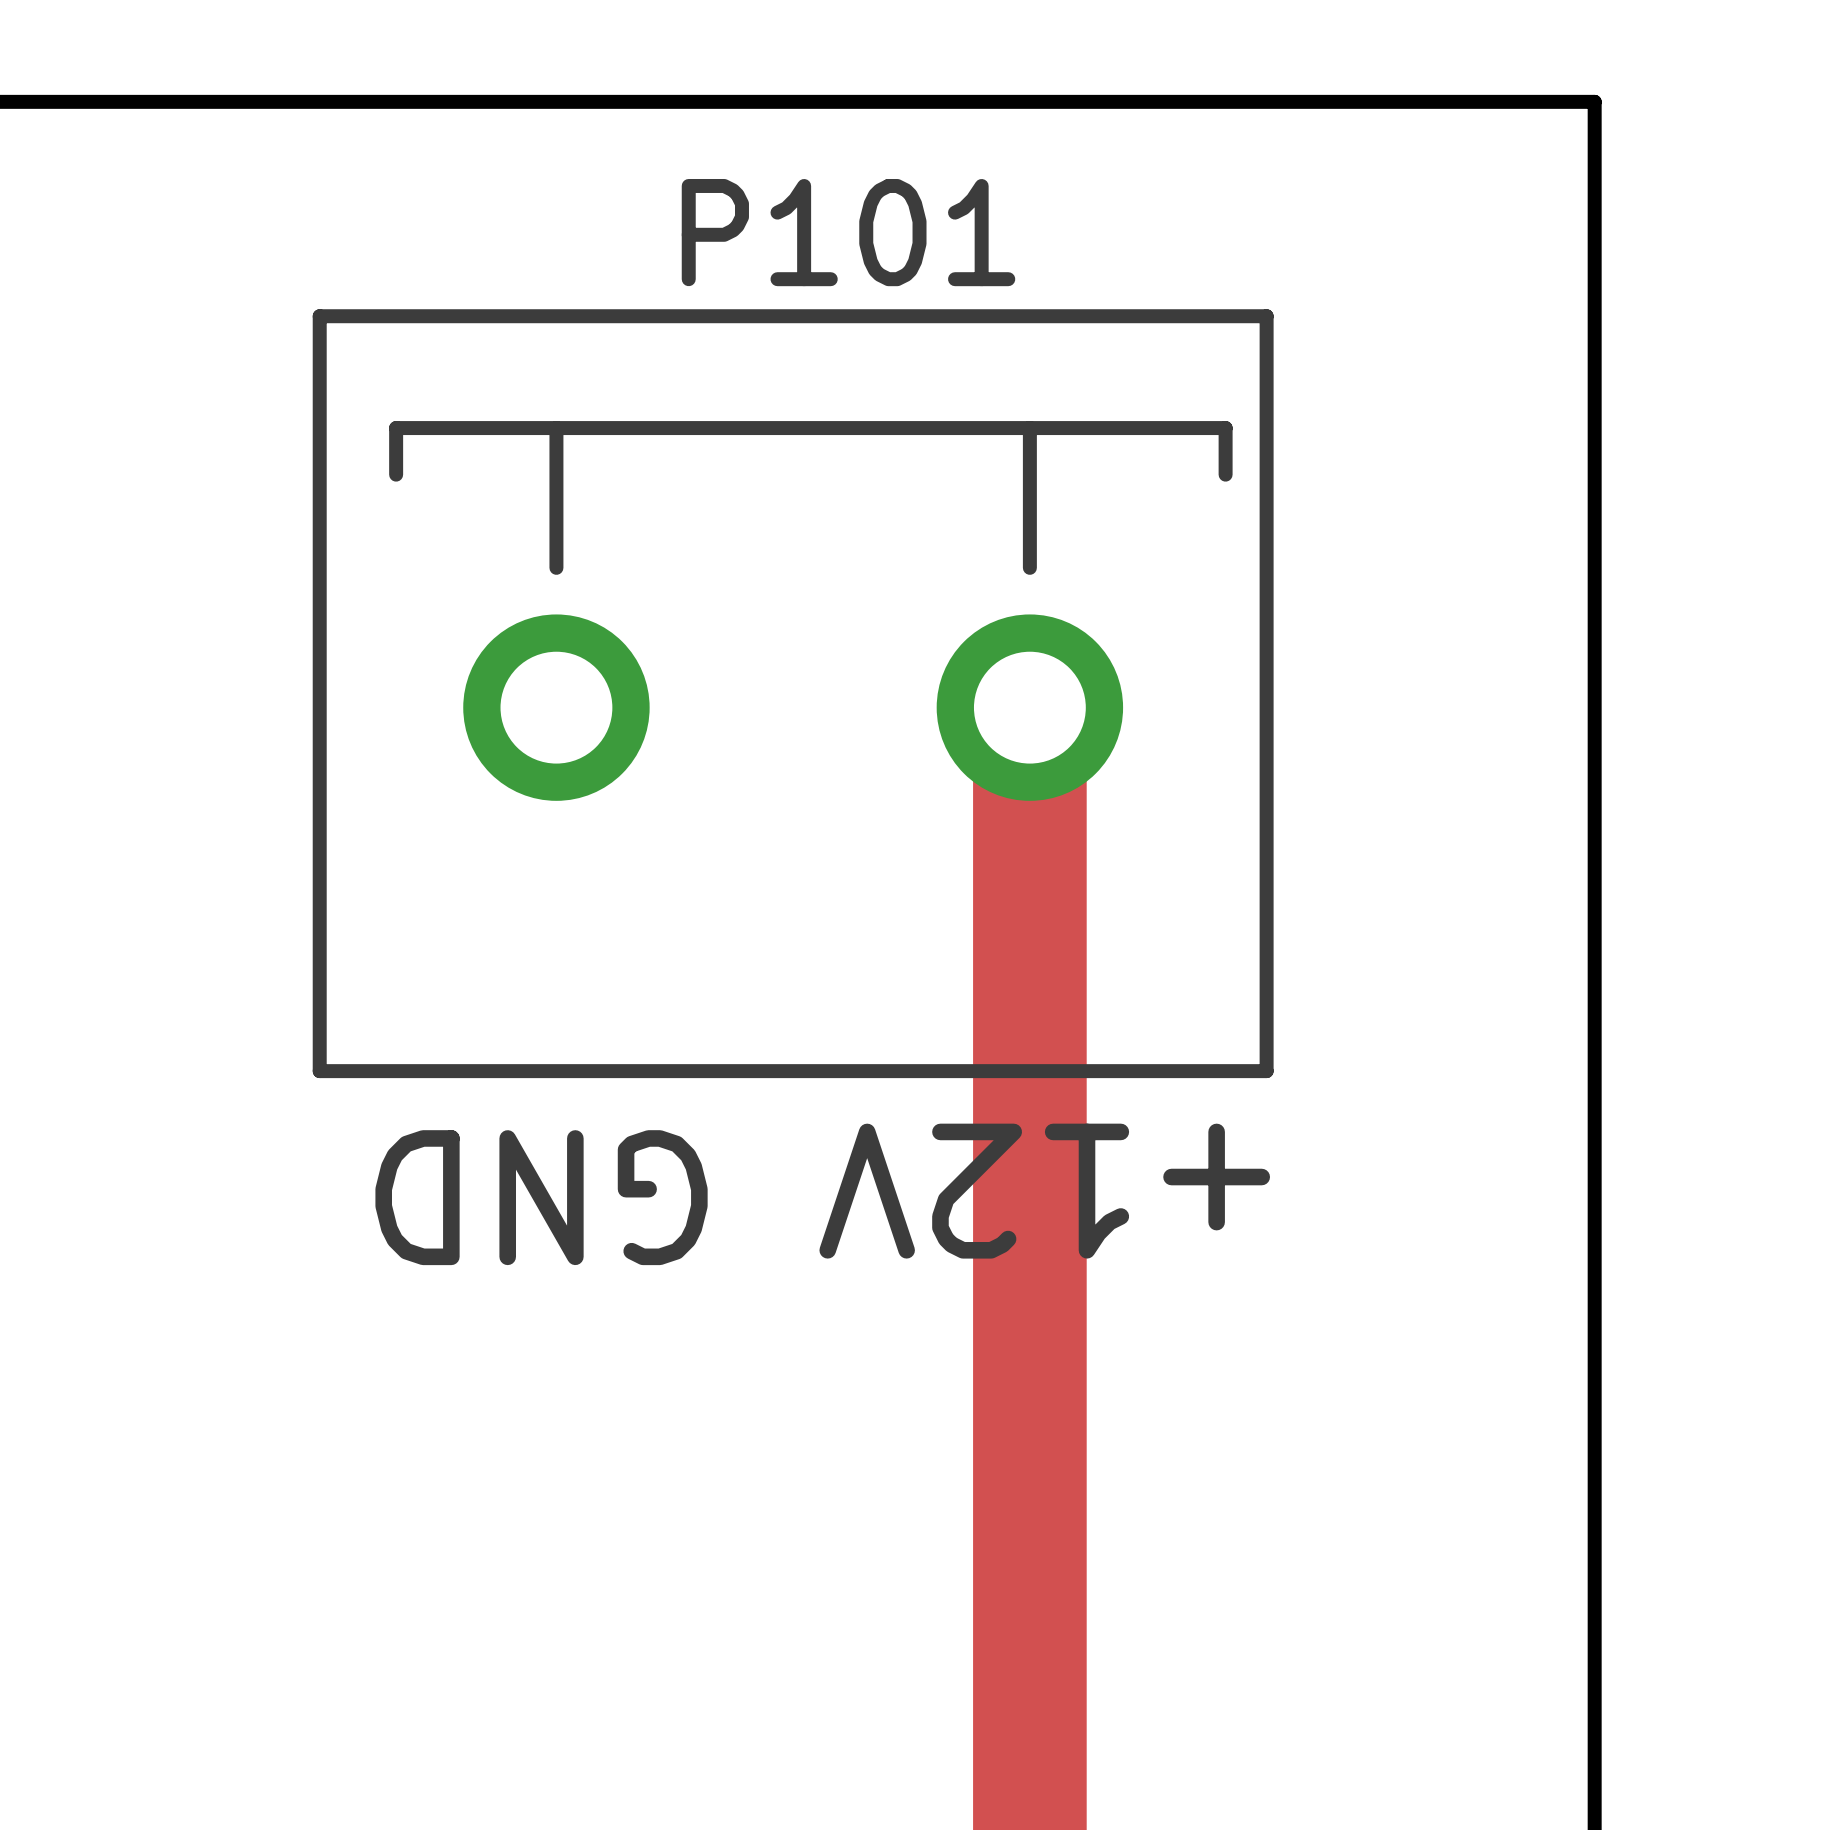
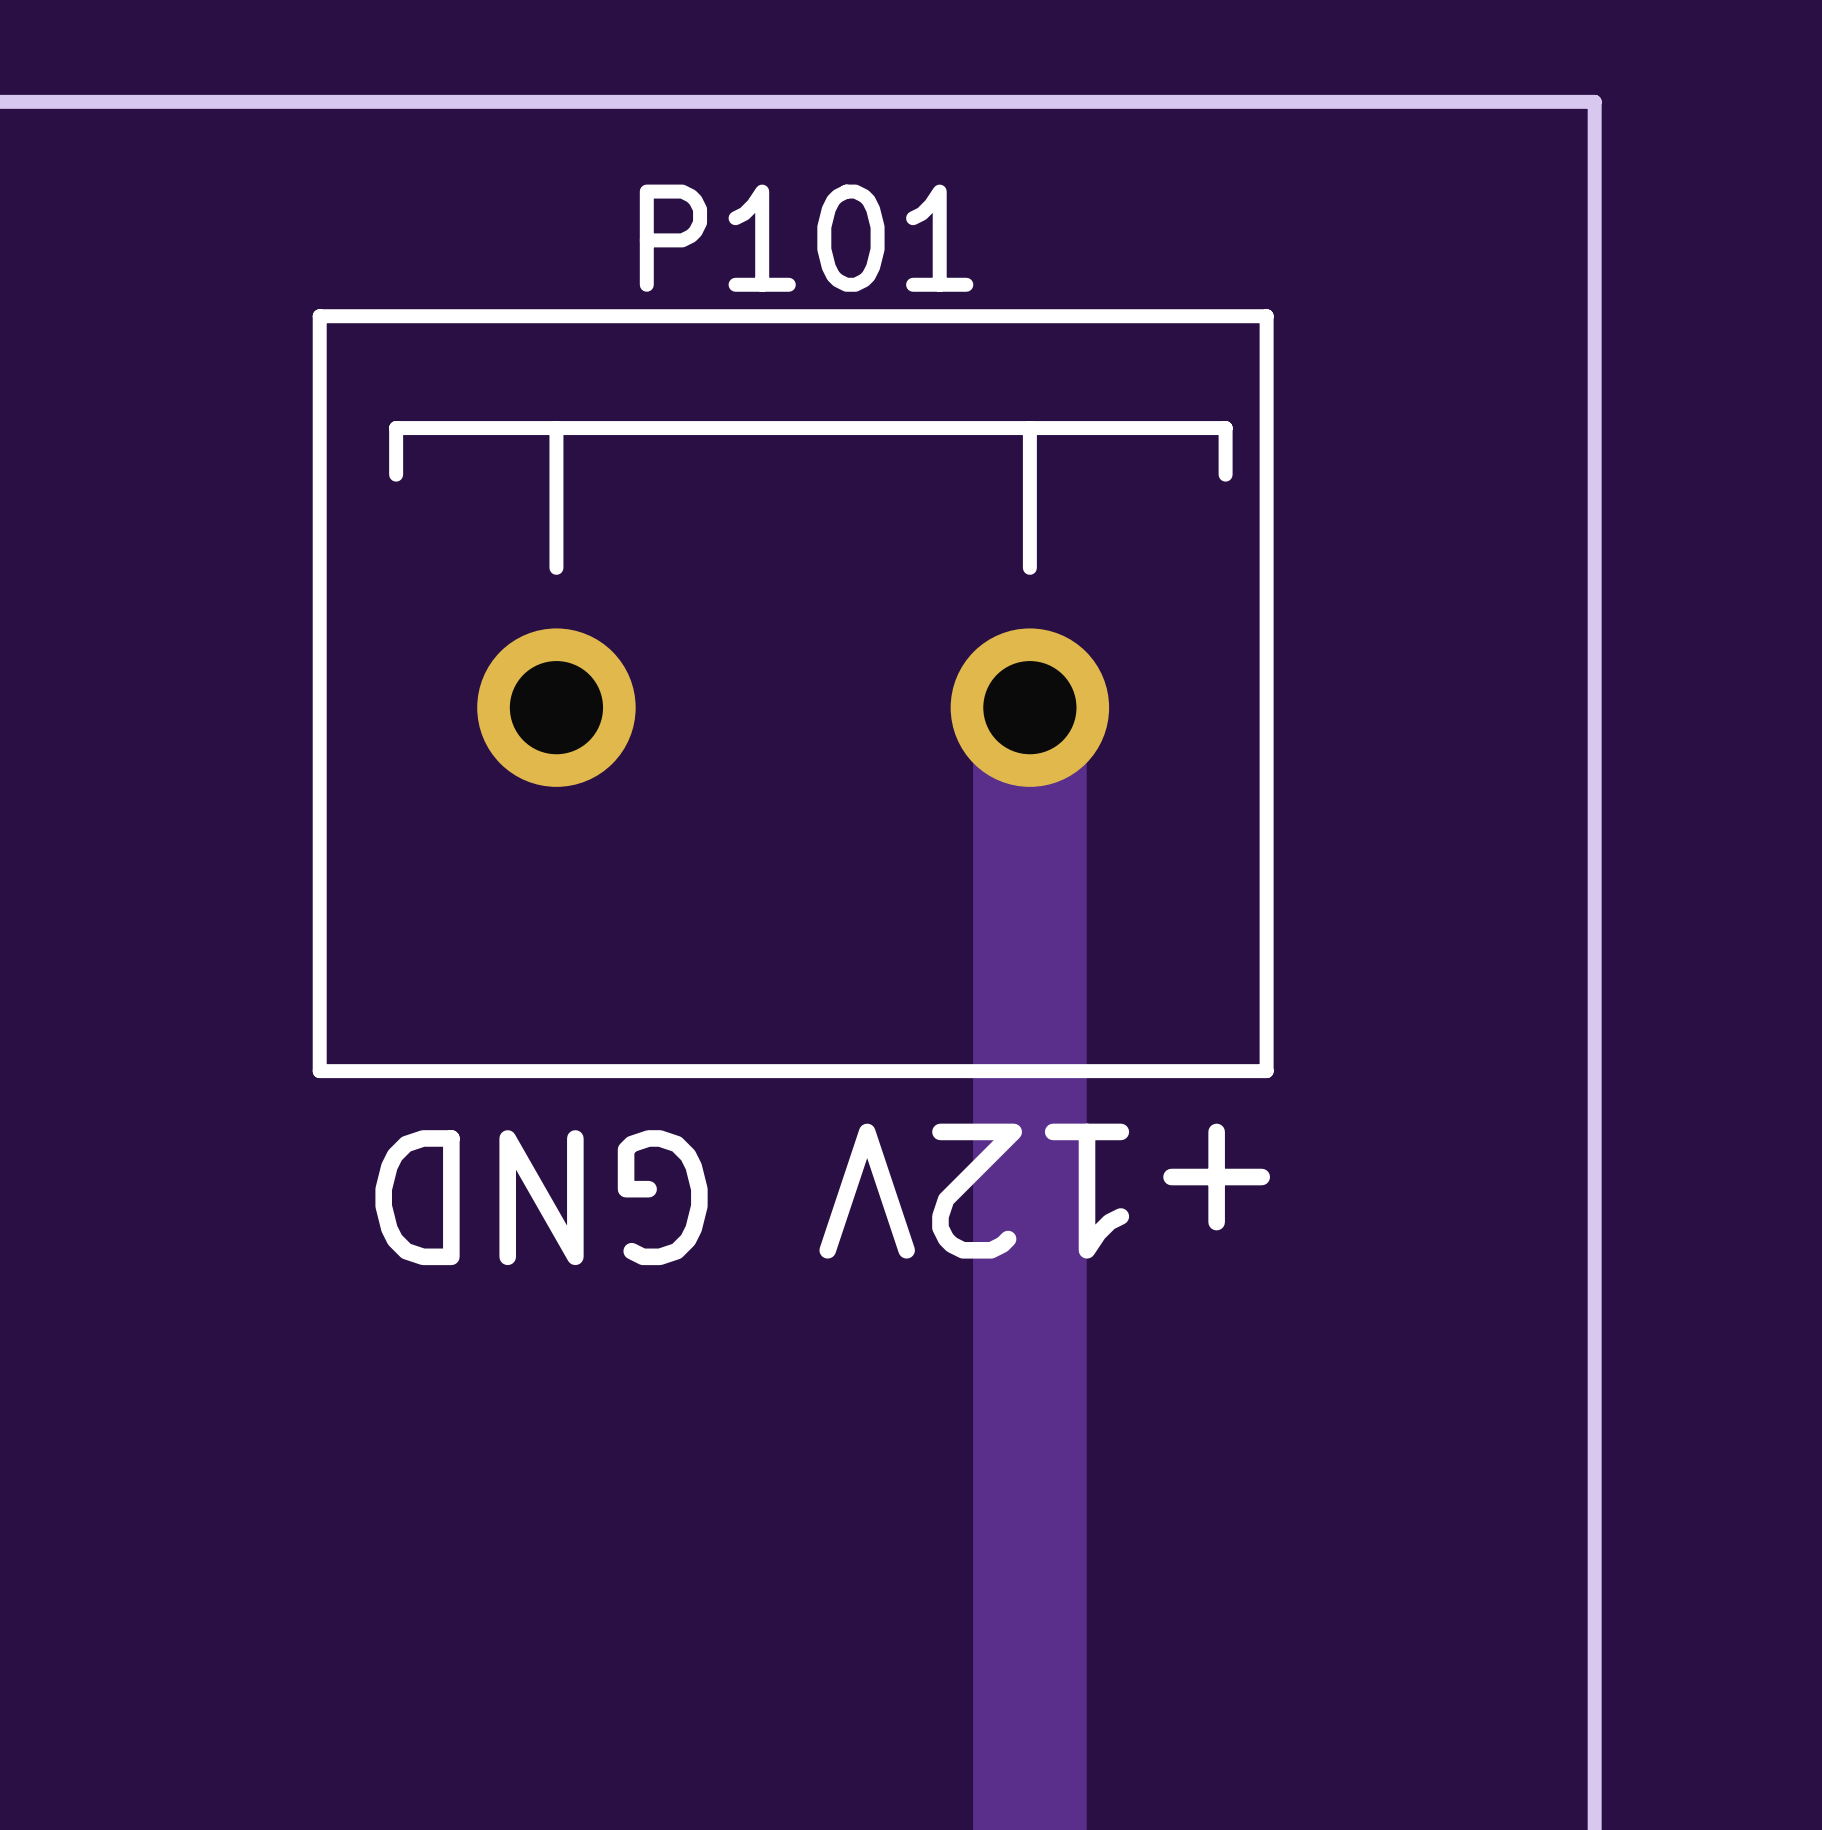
P101 name position: P101 (848, 232) -> P101 (806, 238)
P101 footprint: [312, 309, 1274, 1079] -> [312, 309, 1274, 1079]

